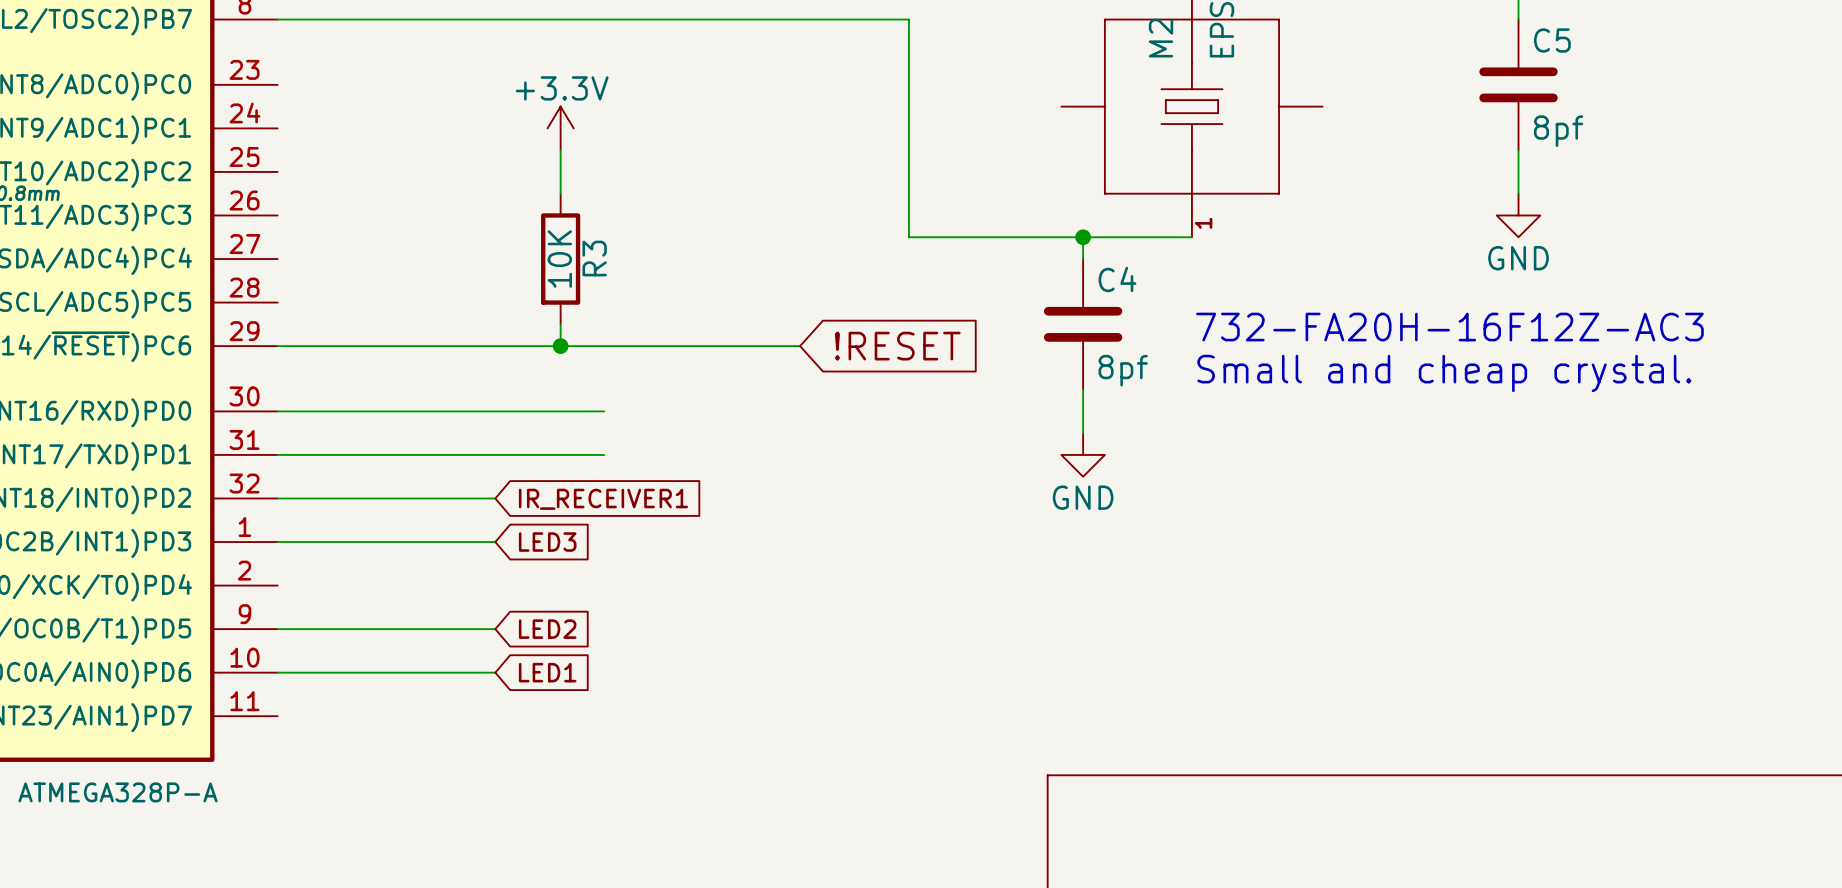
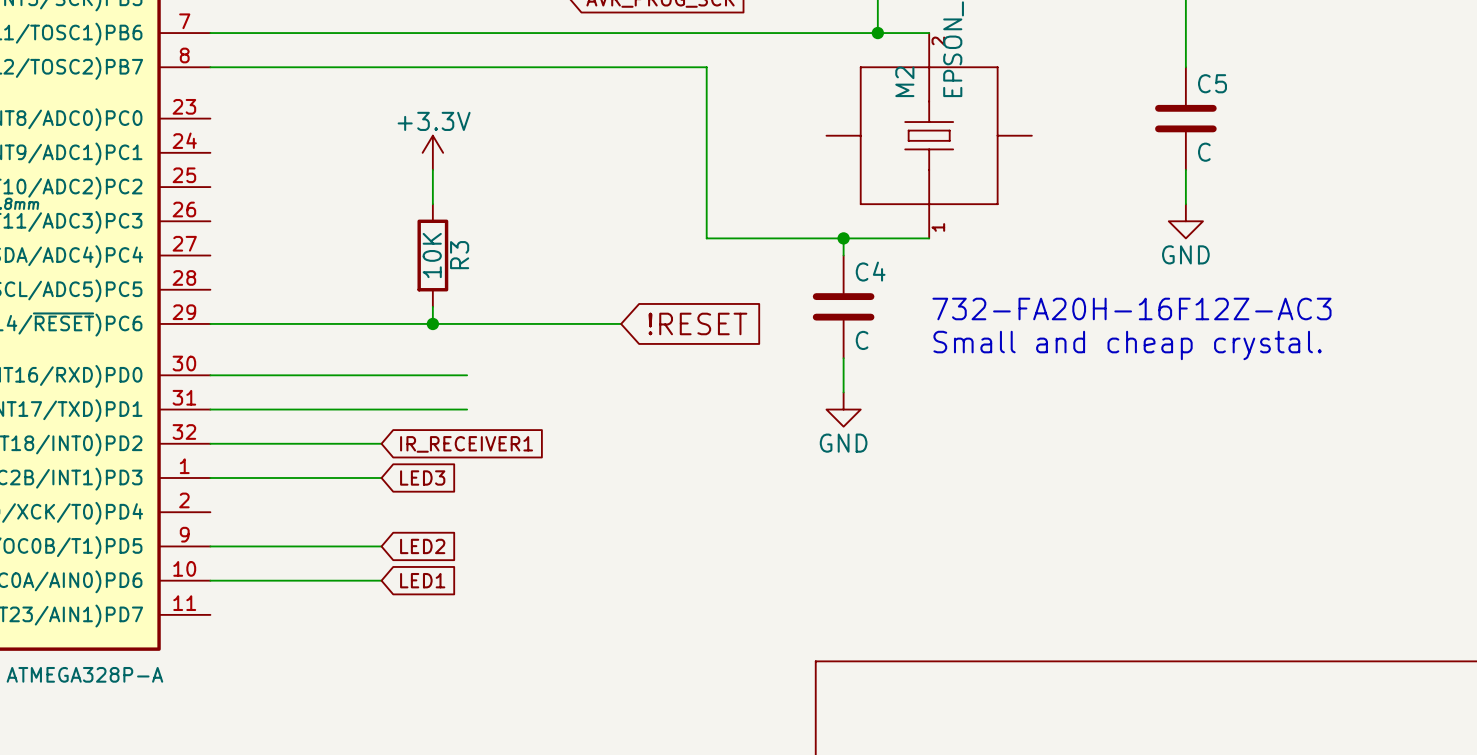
C5 value: 8pf (1558, 131) -> C (1204, 152)
C4 value: 8pf (1123, 370) -> C (862, 340)

